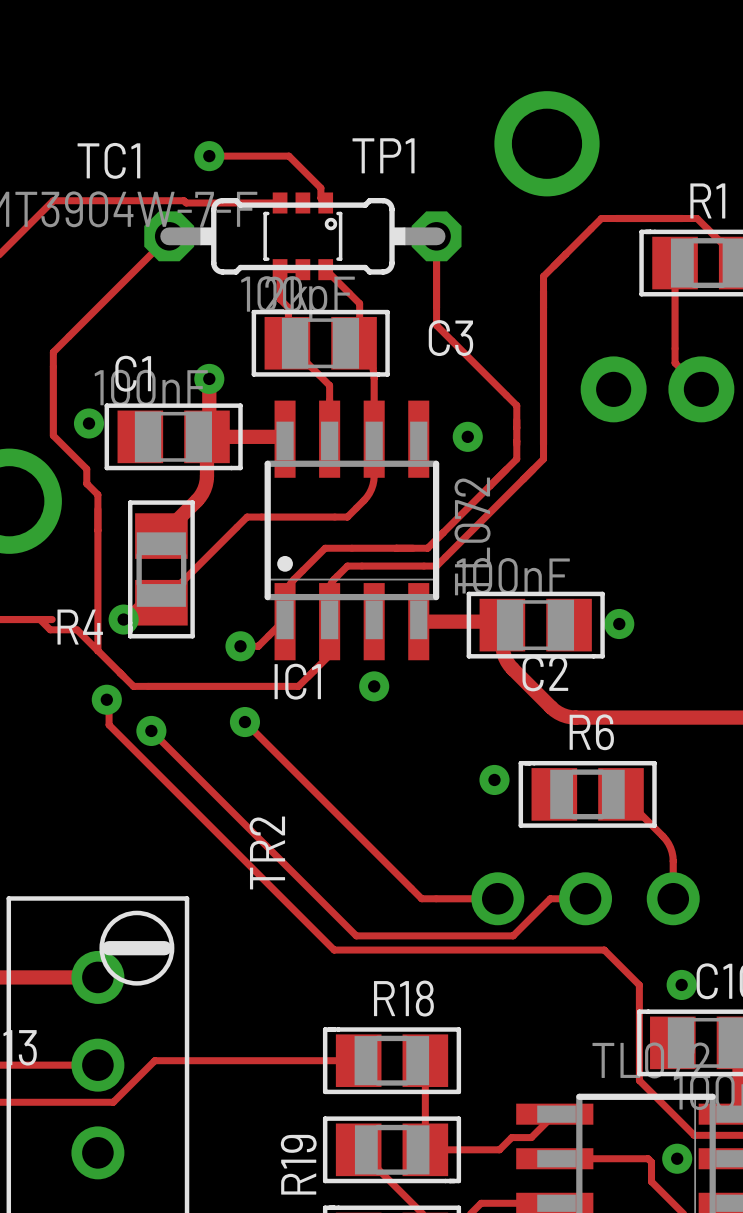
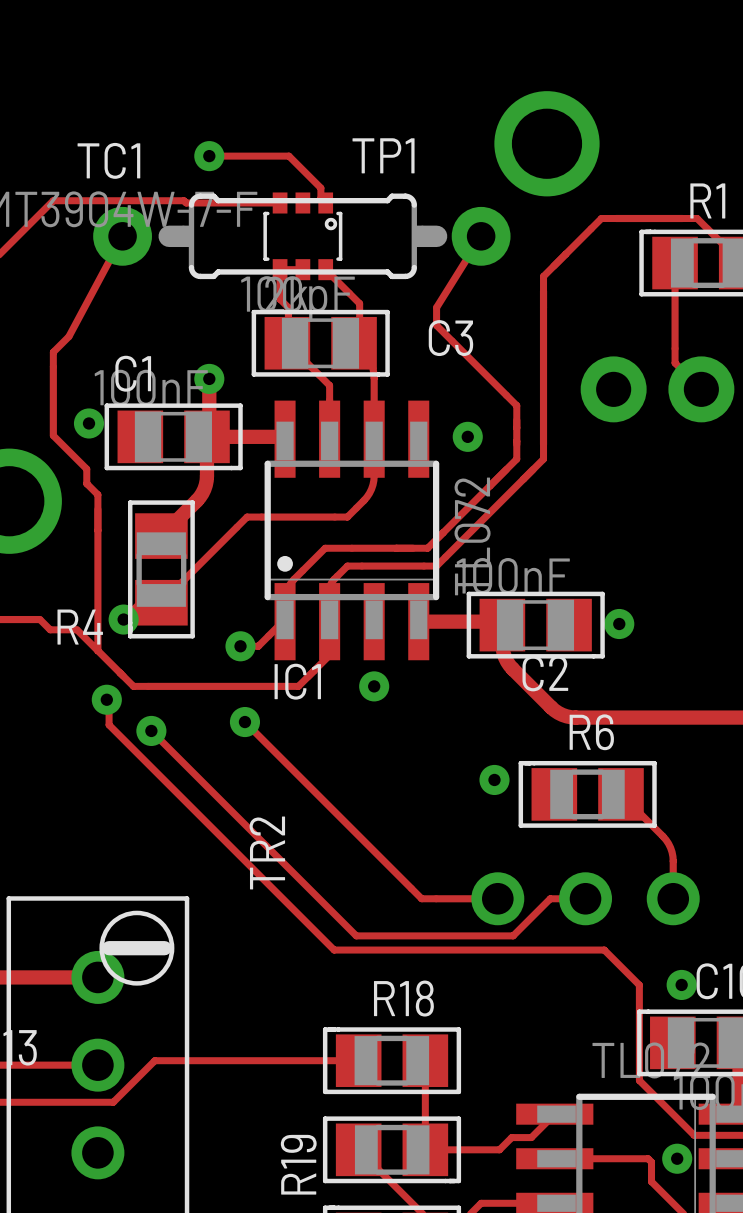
TC1 footprint: [144, 198, 462, 275] -> [93, 193, 511, 280]
track: (169, 236) (68, 336) -> (122, 236) (68, 336)
track: (436, 236) (436, 307) -> (481, 236) (436, 307)
track: (39, 619) (52, 619) -> none

